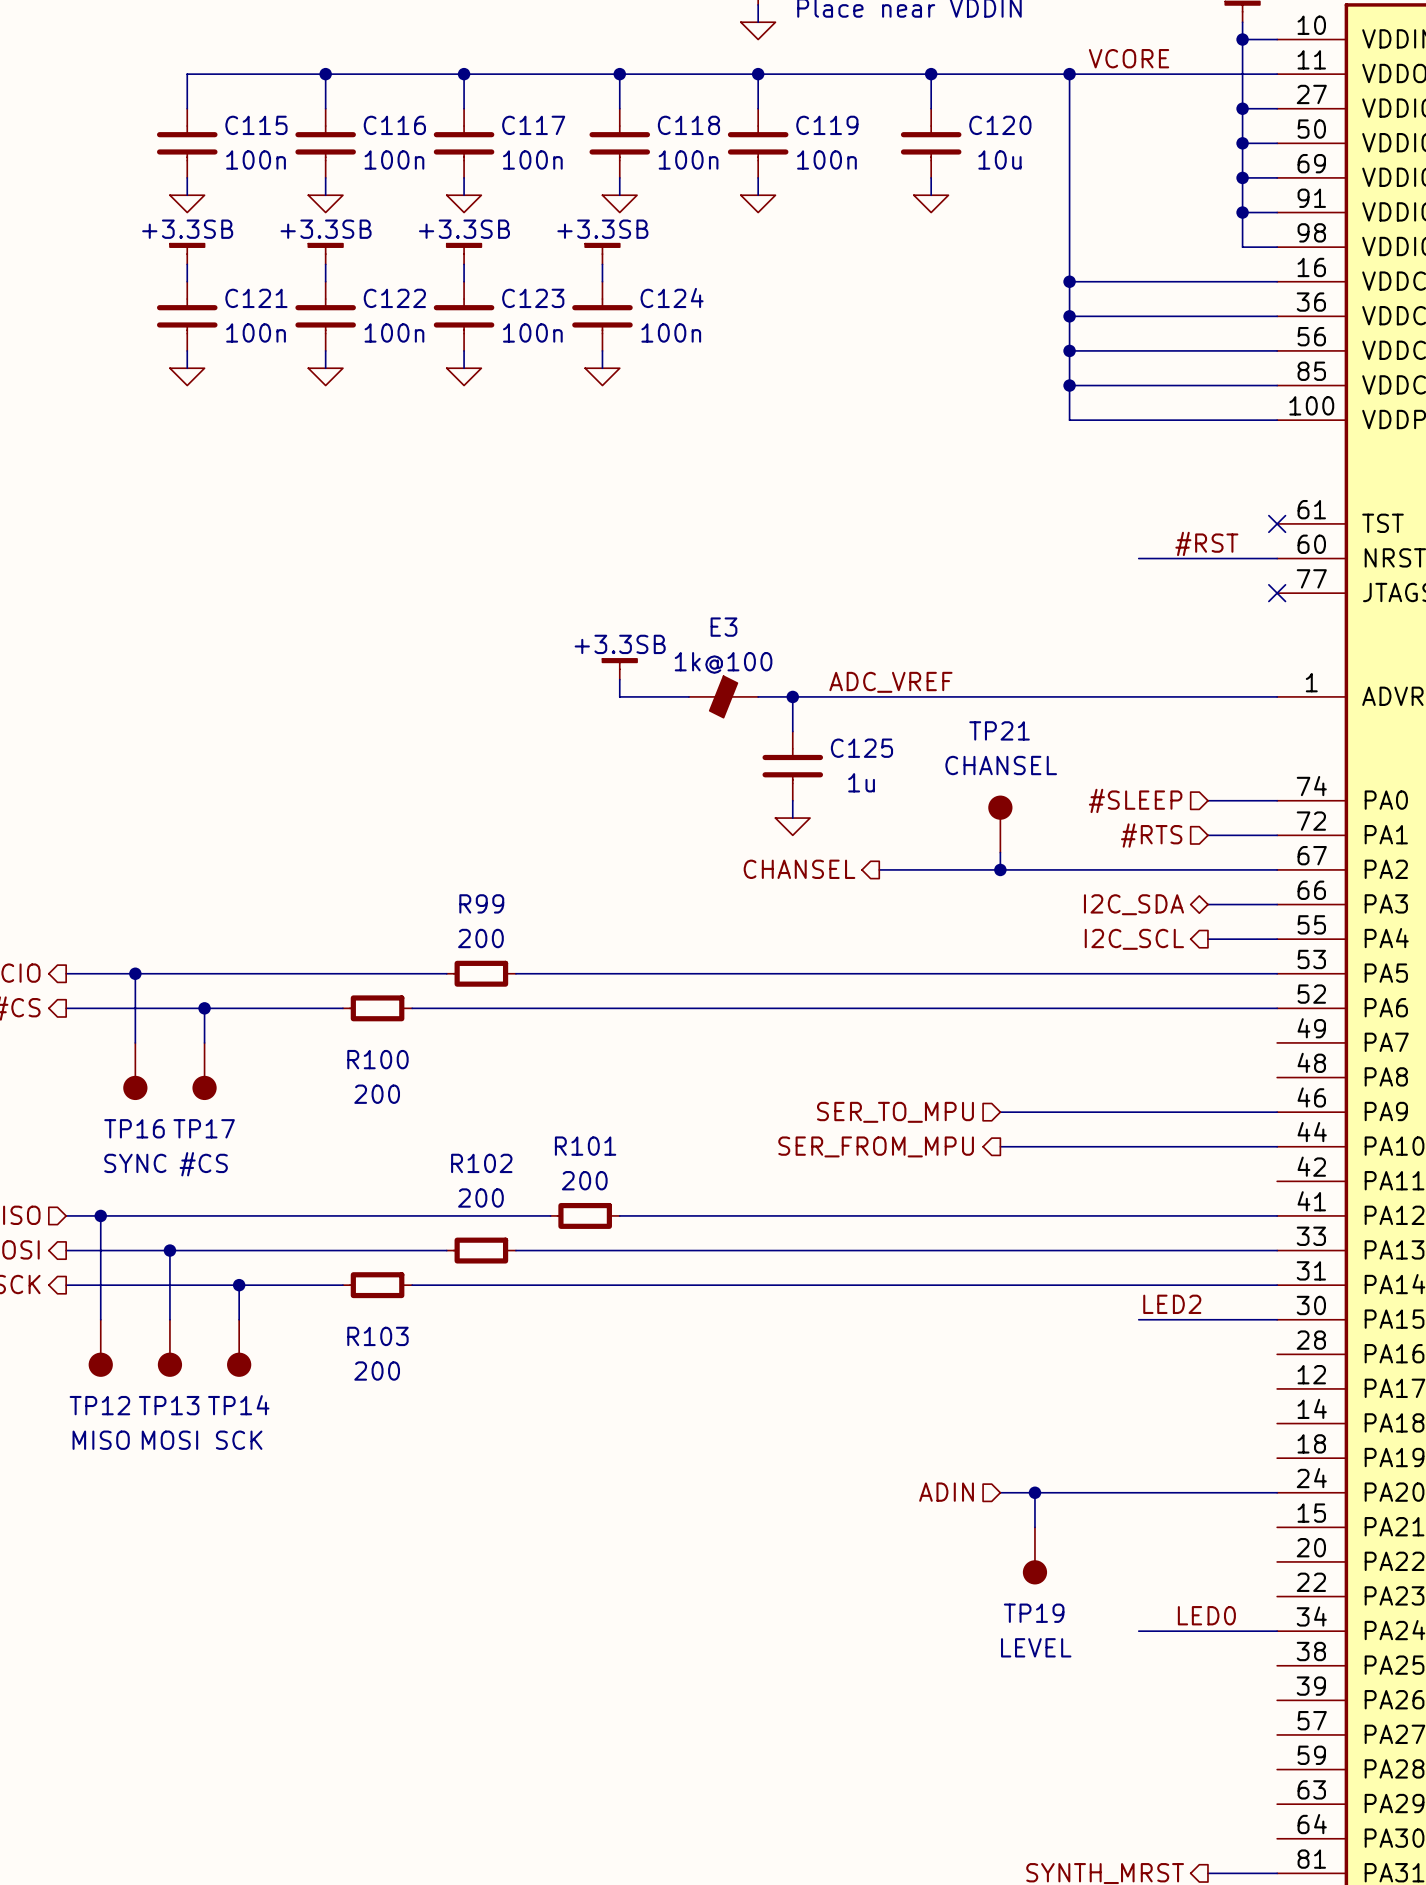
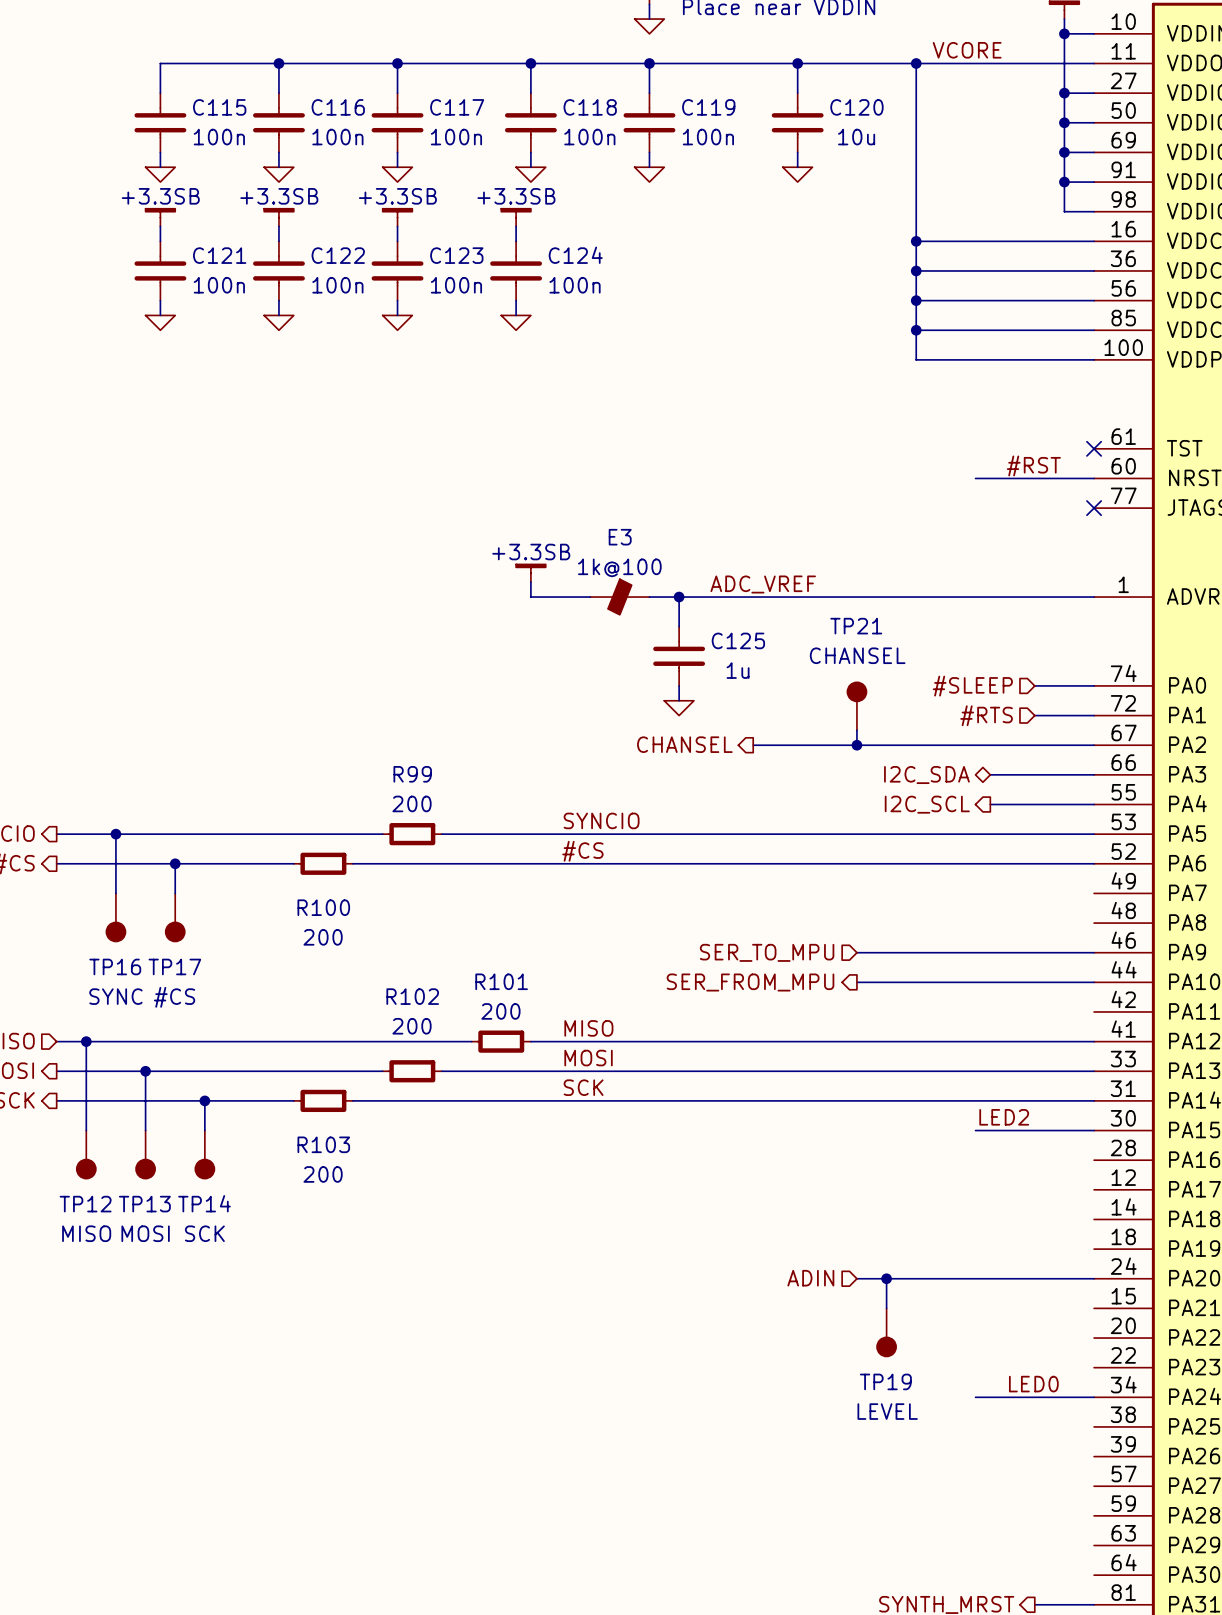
hierarchical label position: I2C_SDA (1133, 904) -> I2C_SDA (926, 775)
wire: none -> (990, 774) (1034, 774)
hierarchical label position: I2C_SCL (1134, 939) -> I2C_SCL (927, 804)
wire: none -> (990, 804) (1034, 804)
label: none -> SYNCIO (601, 820)
label: none -> #CS (582, 851)
label: none -> MISO (588, 1028)
label: none -> MOSI (588, 1058)
label: none -> SCK (583, 1087)

